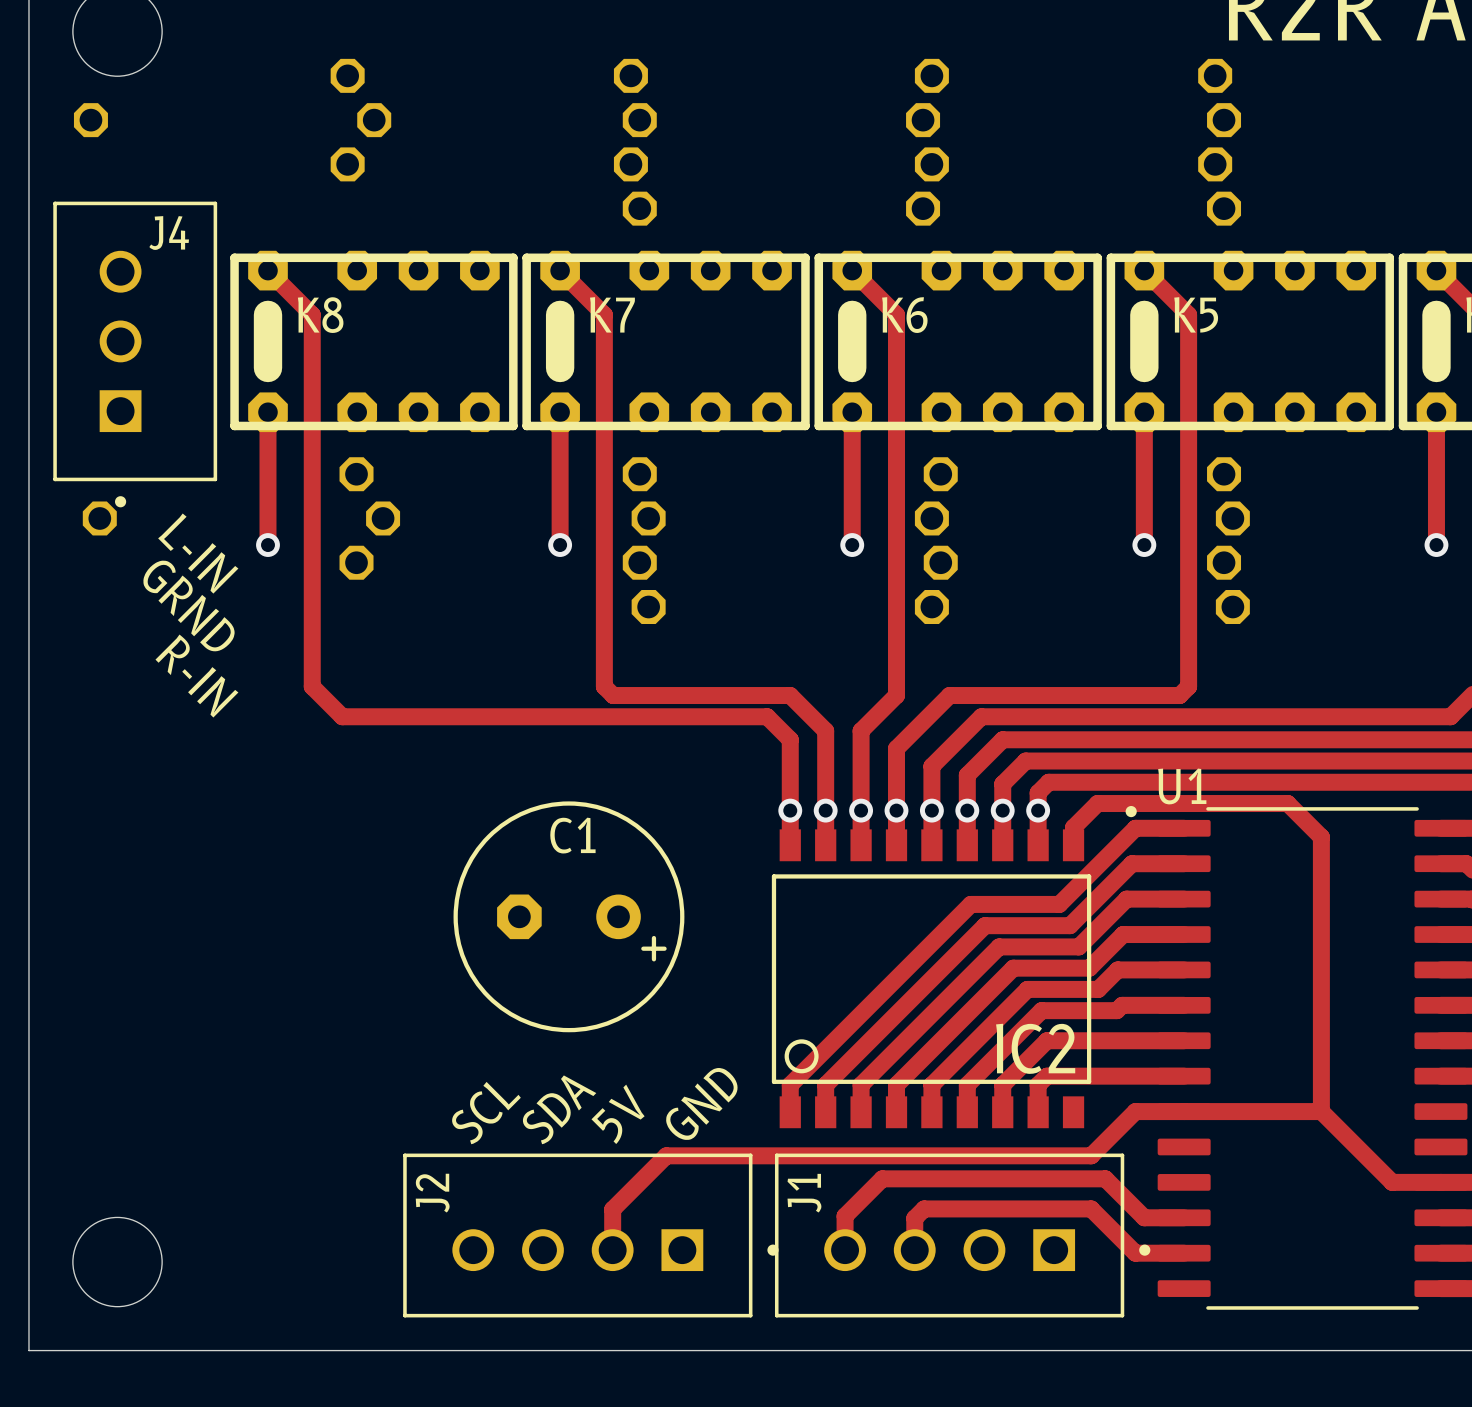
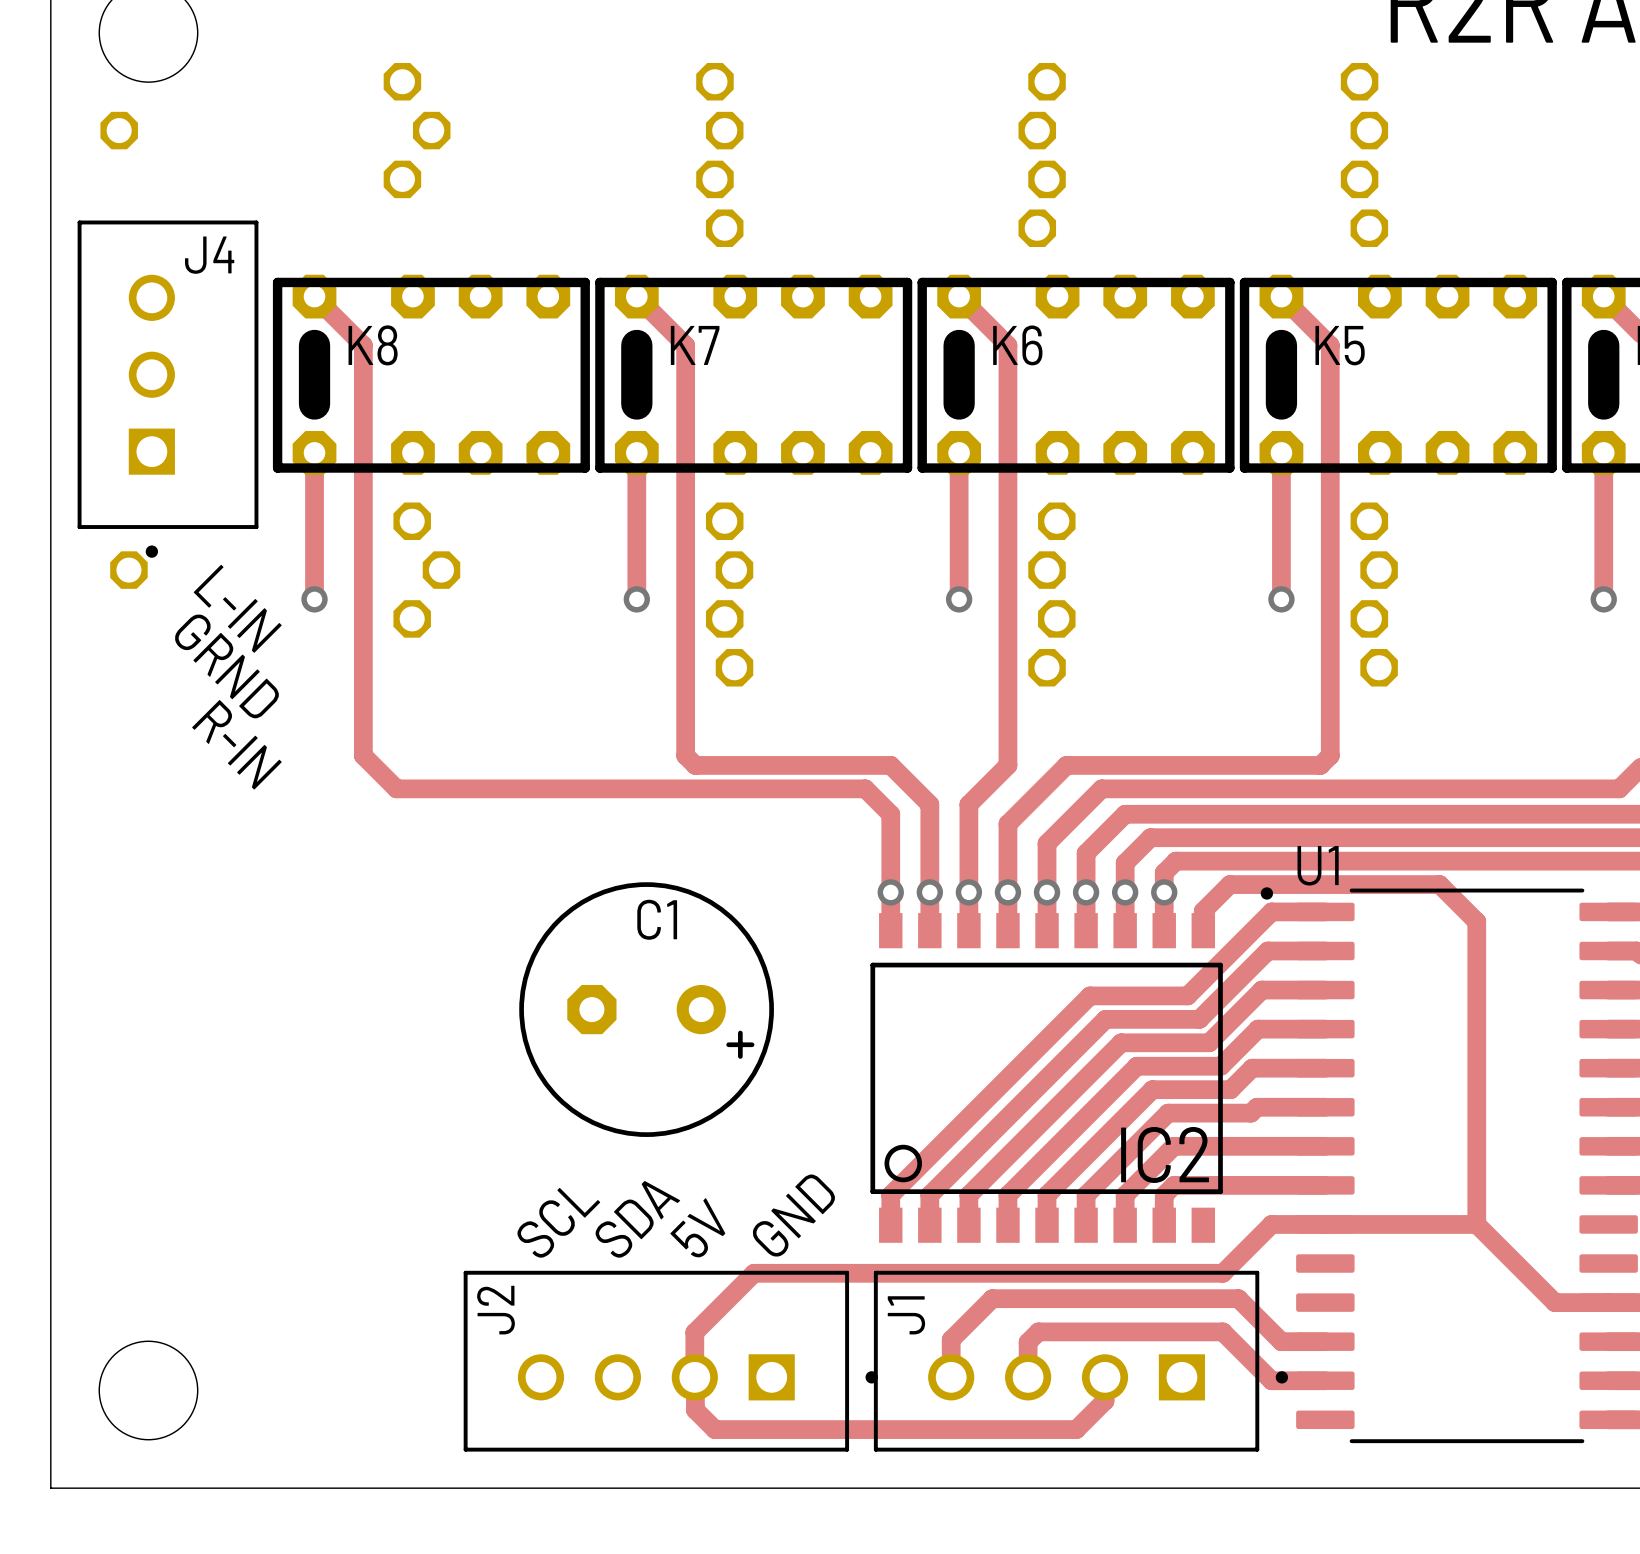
track: none -> (694, 1377) (695, 1410) (714, 1429) (1076, 1429) (1105, 1400) (1105, 1377)

